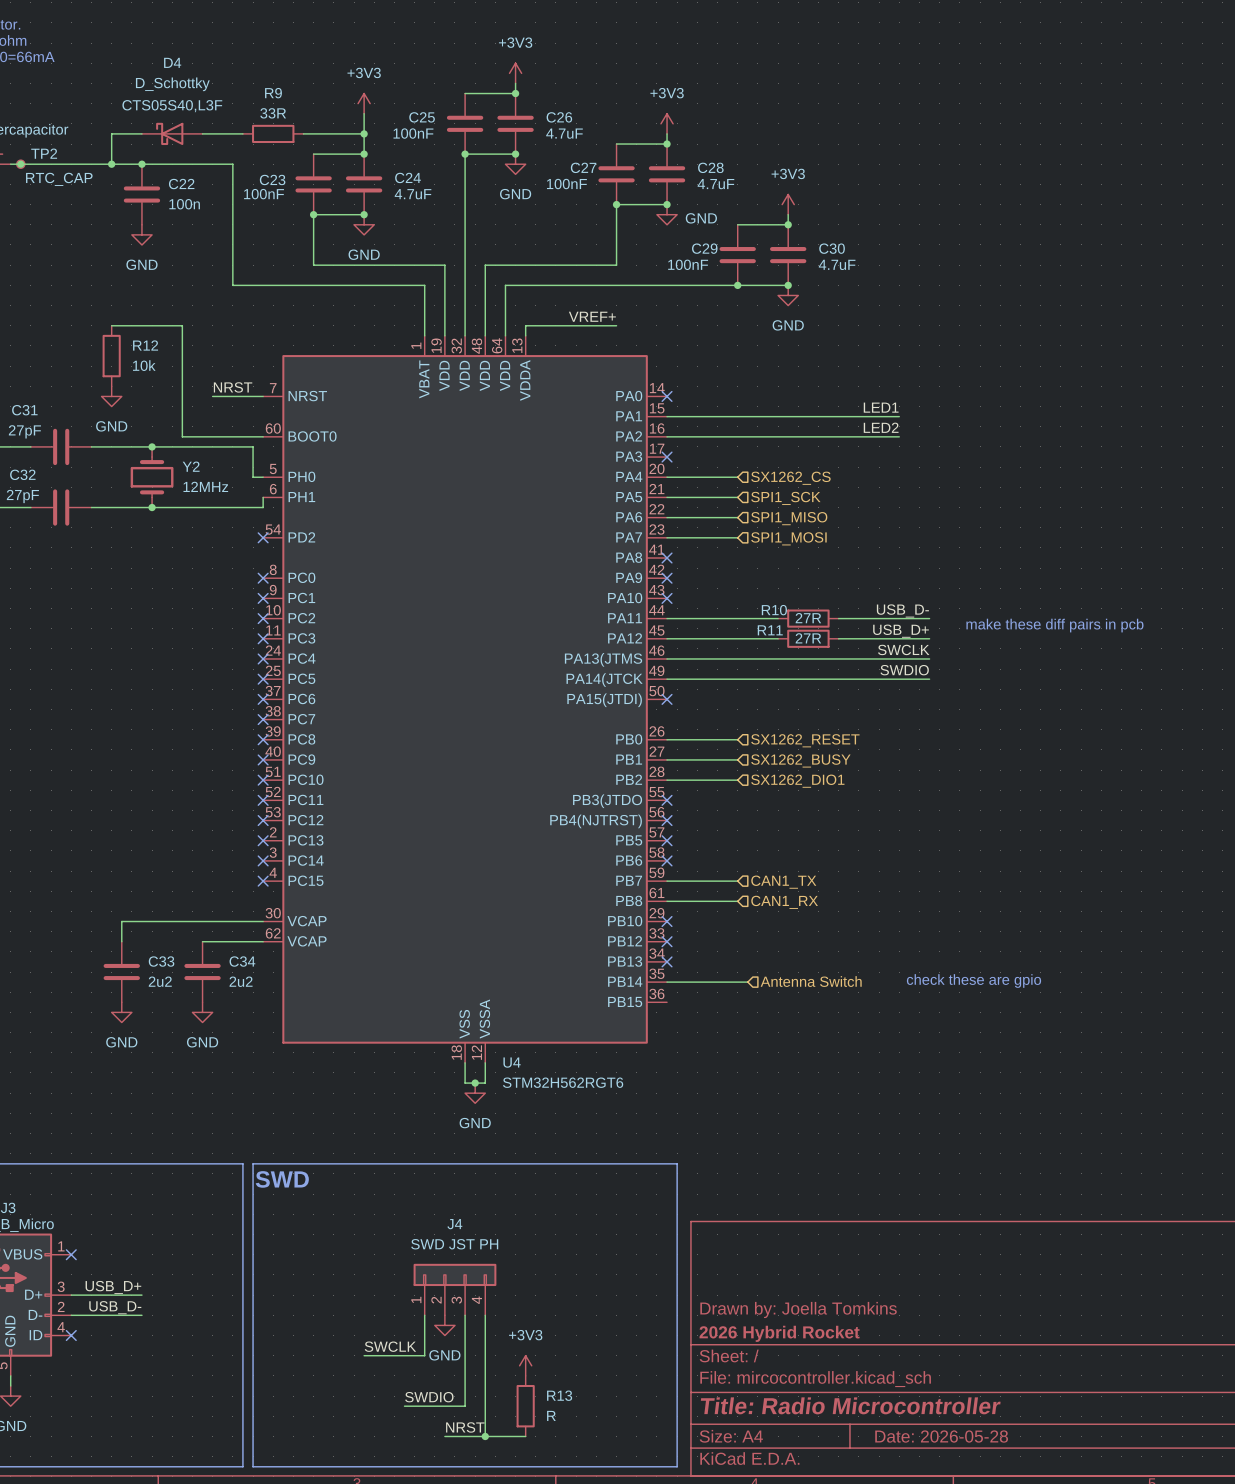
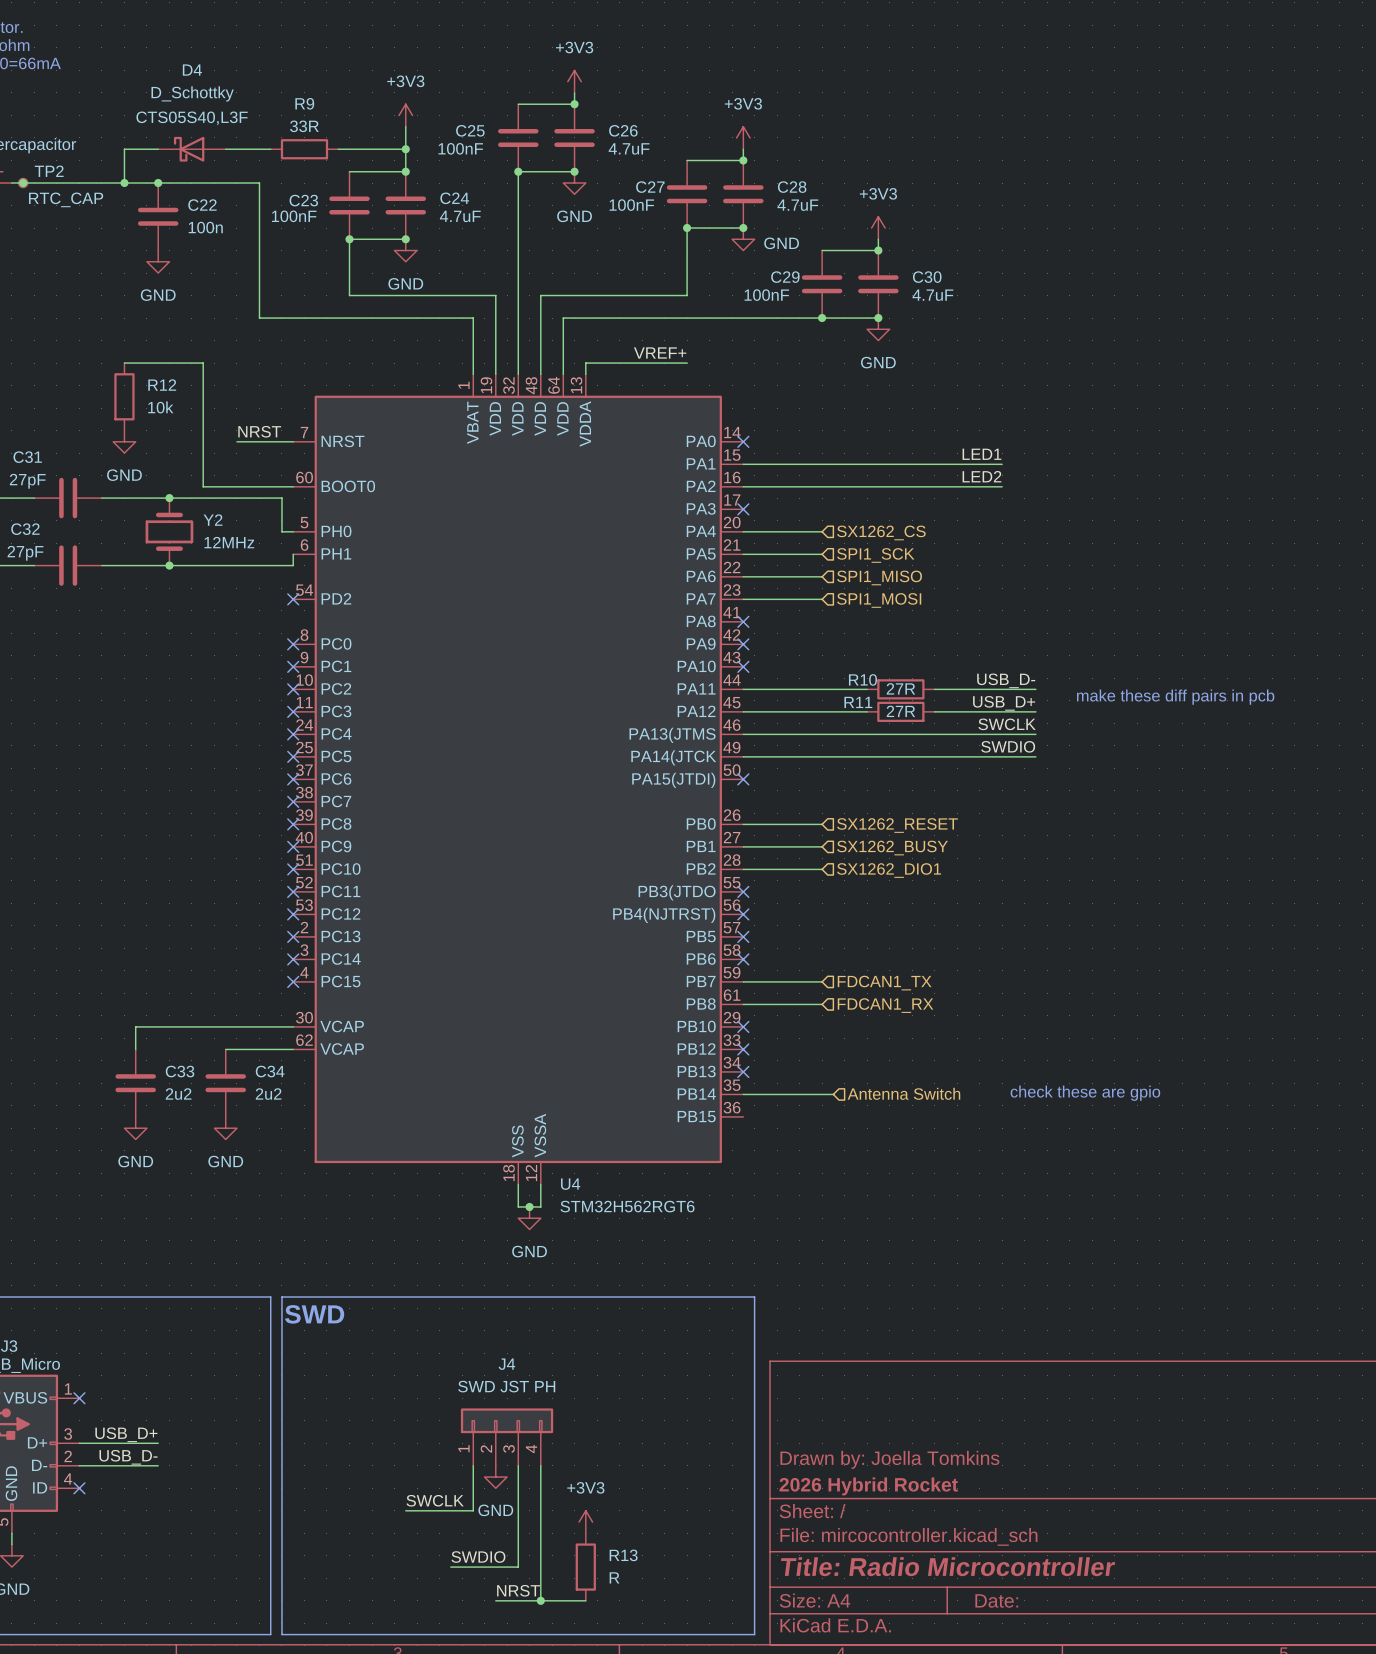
hierarchical label: CAN1_TX (783, 882) -> FDCAN1_TX (884, 983)
hierarchical label: CAN1_RX (784, 902) -> FDCAN1_RX (885, 1005)
title block: Date: 2026-05-28 (941, 1436) -> Date: (996, 1600)

